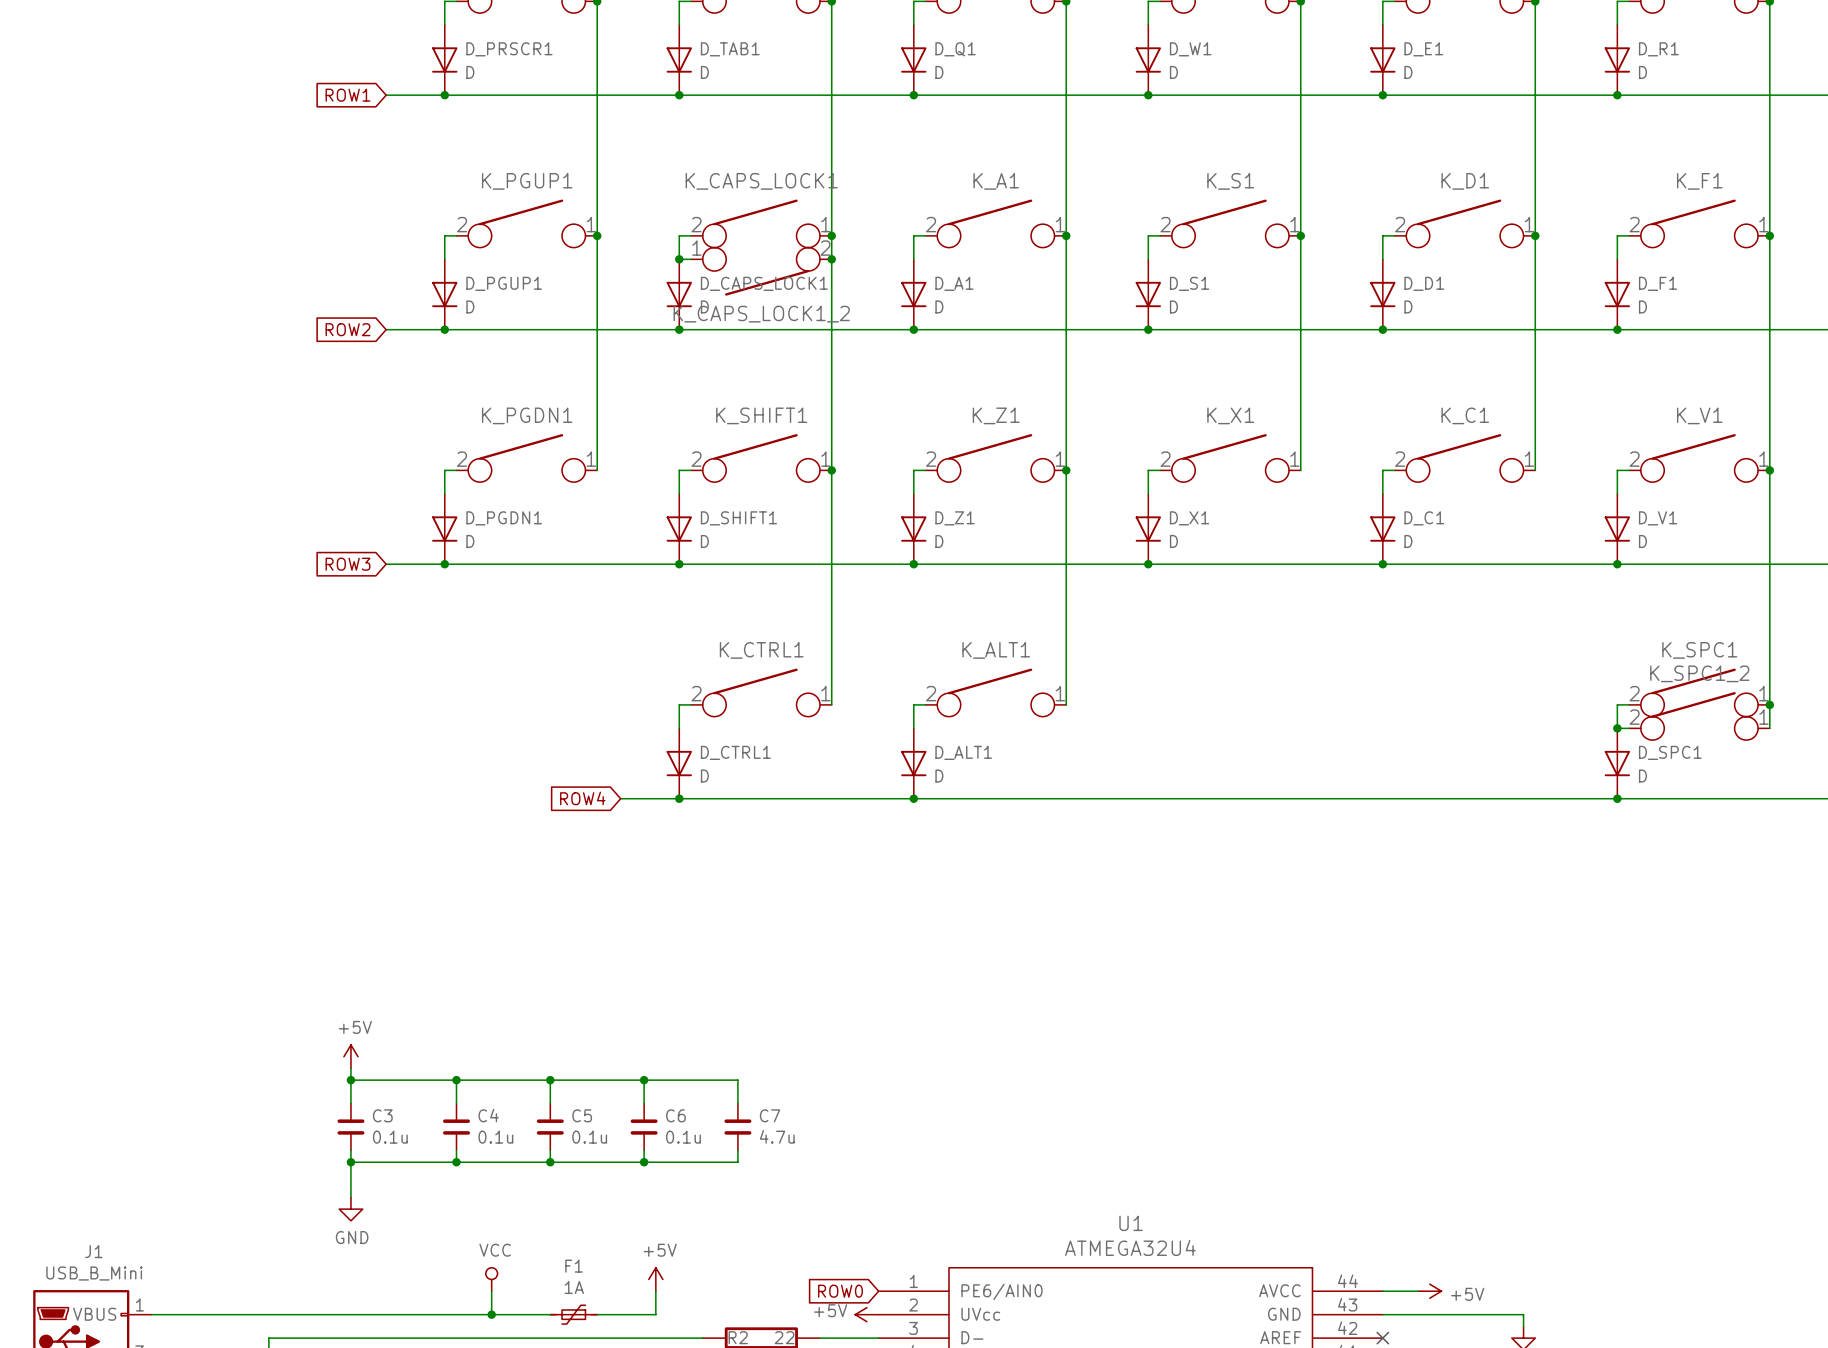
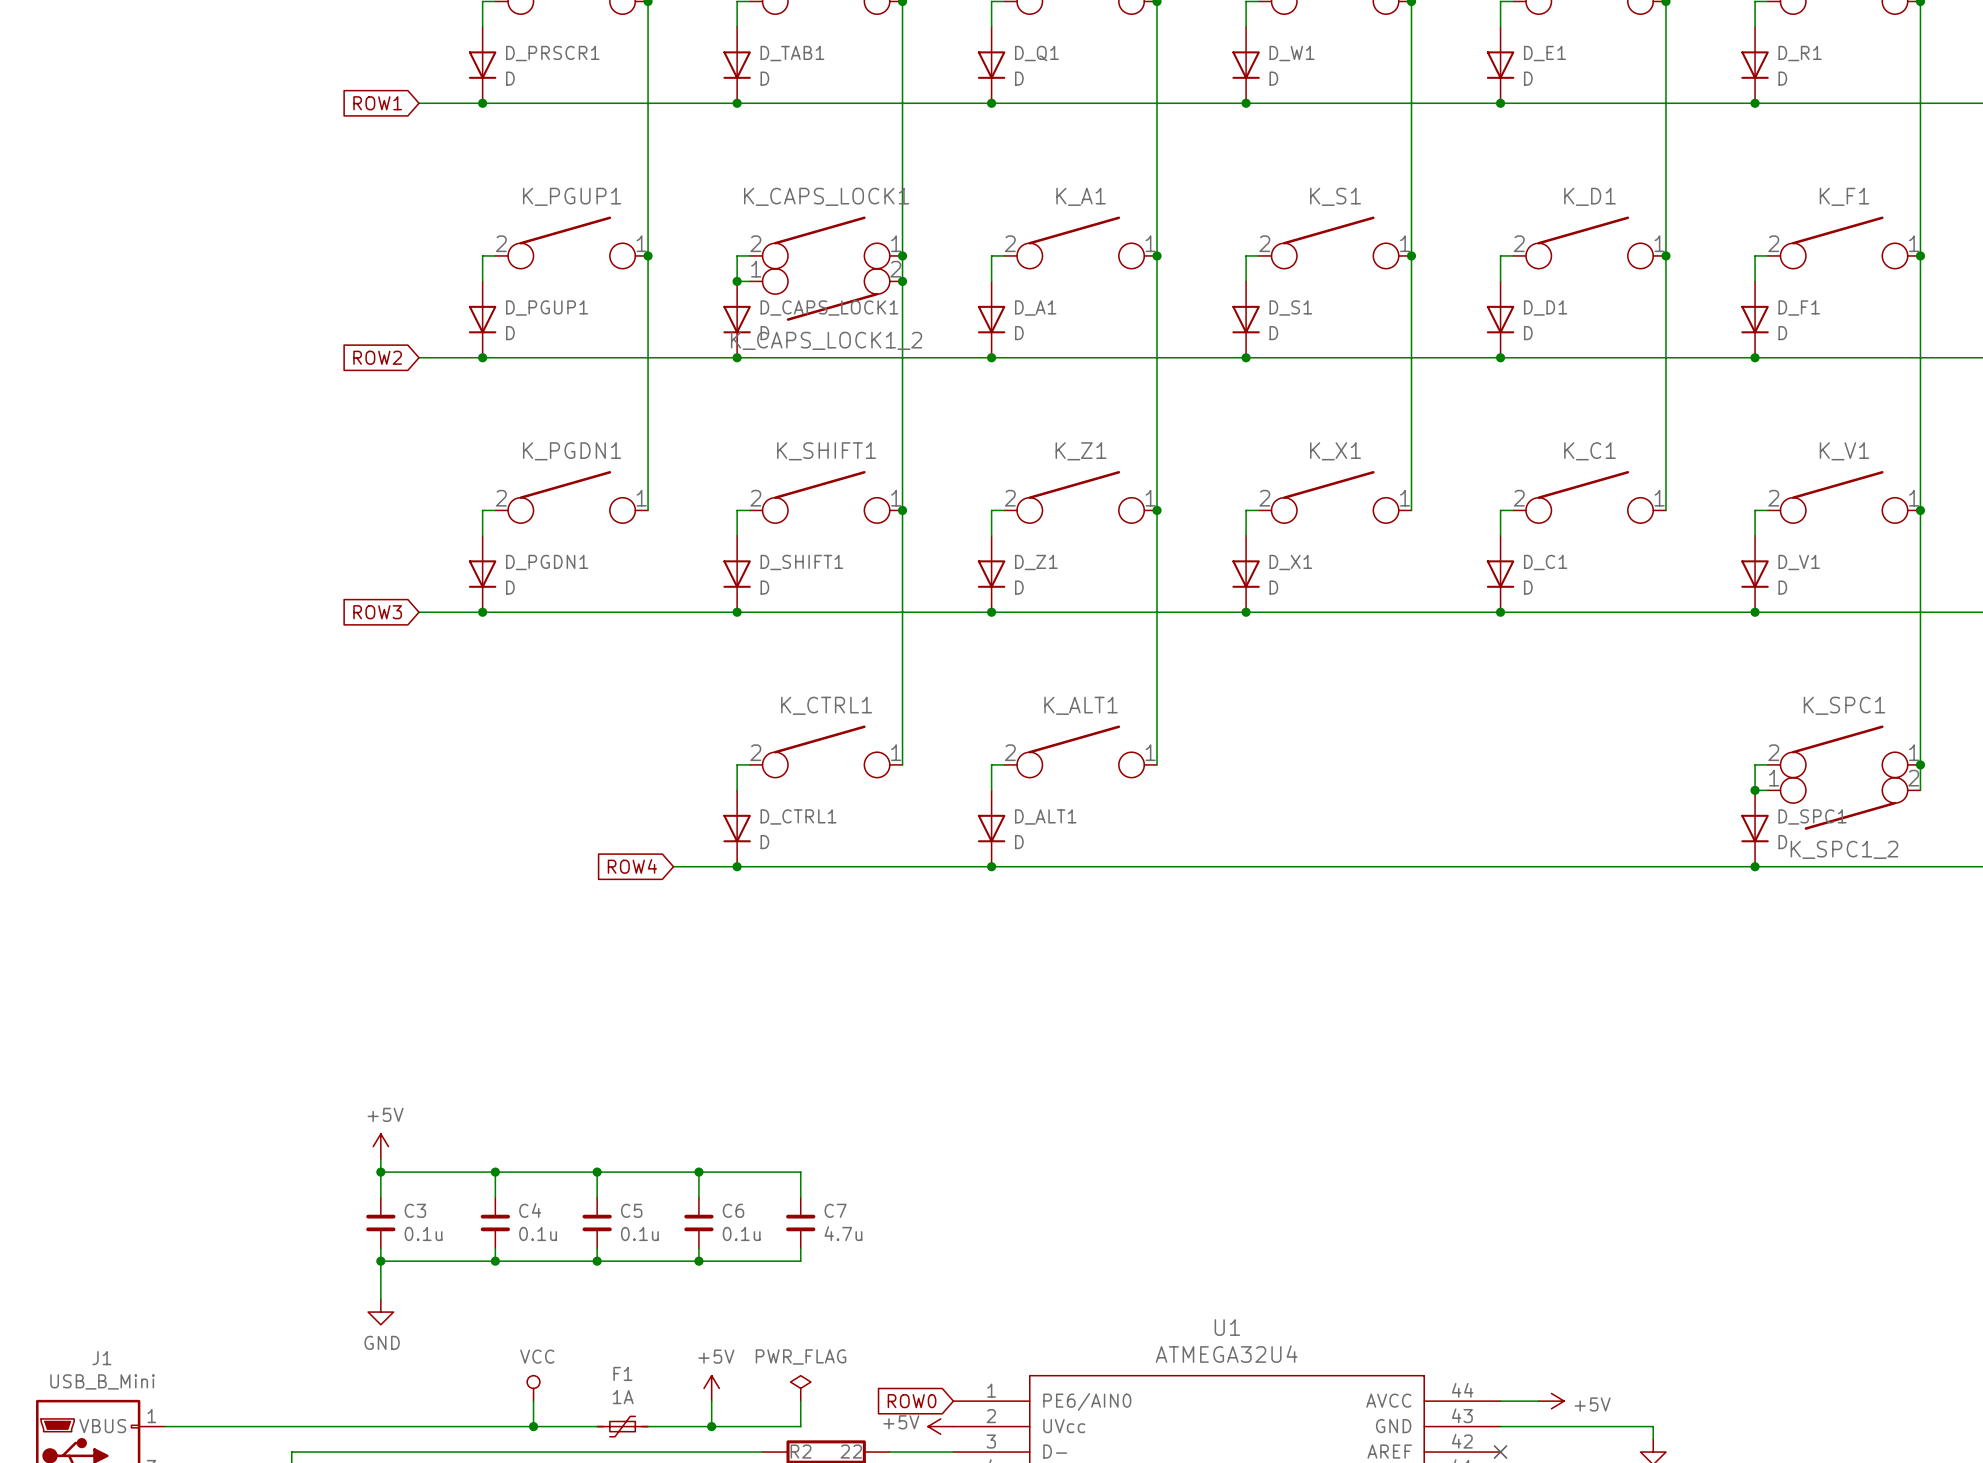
K_SPC1_2 rotation: 0° (1699, 716) -> 180° (1844, 803)
power symbol: none -> PWR_FLAG (800, 1388)
wire: none -> (800, 1401) (800, 1426) (711, 1426)
junction: none -> (711, 1426)

